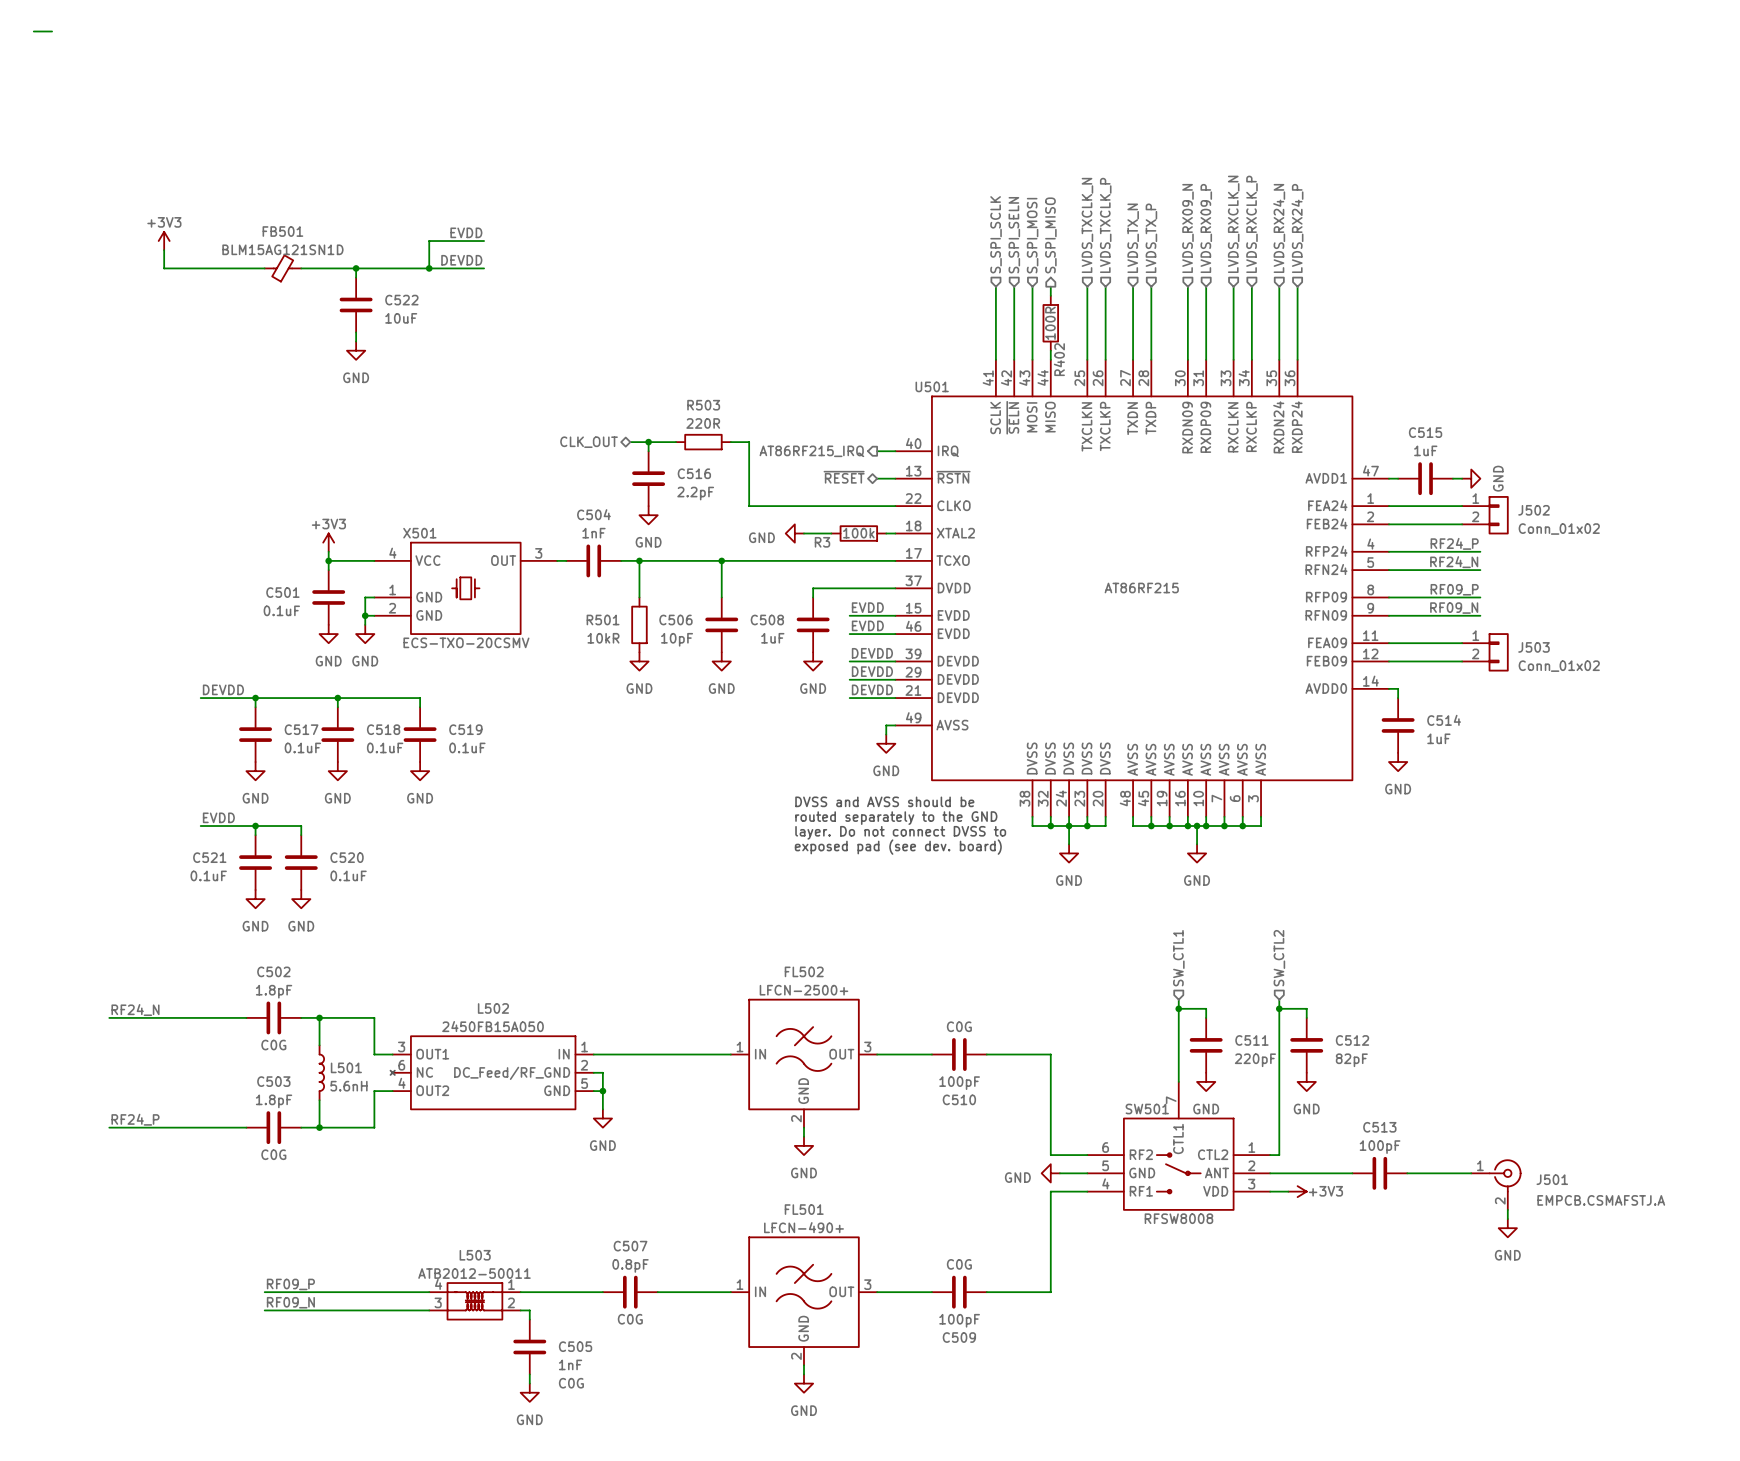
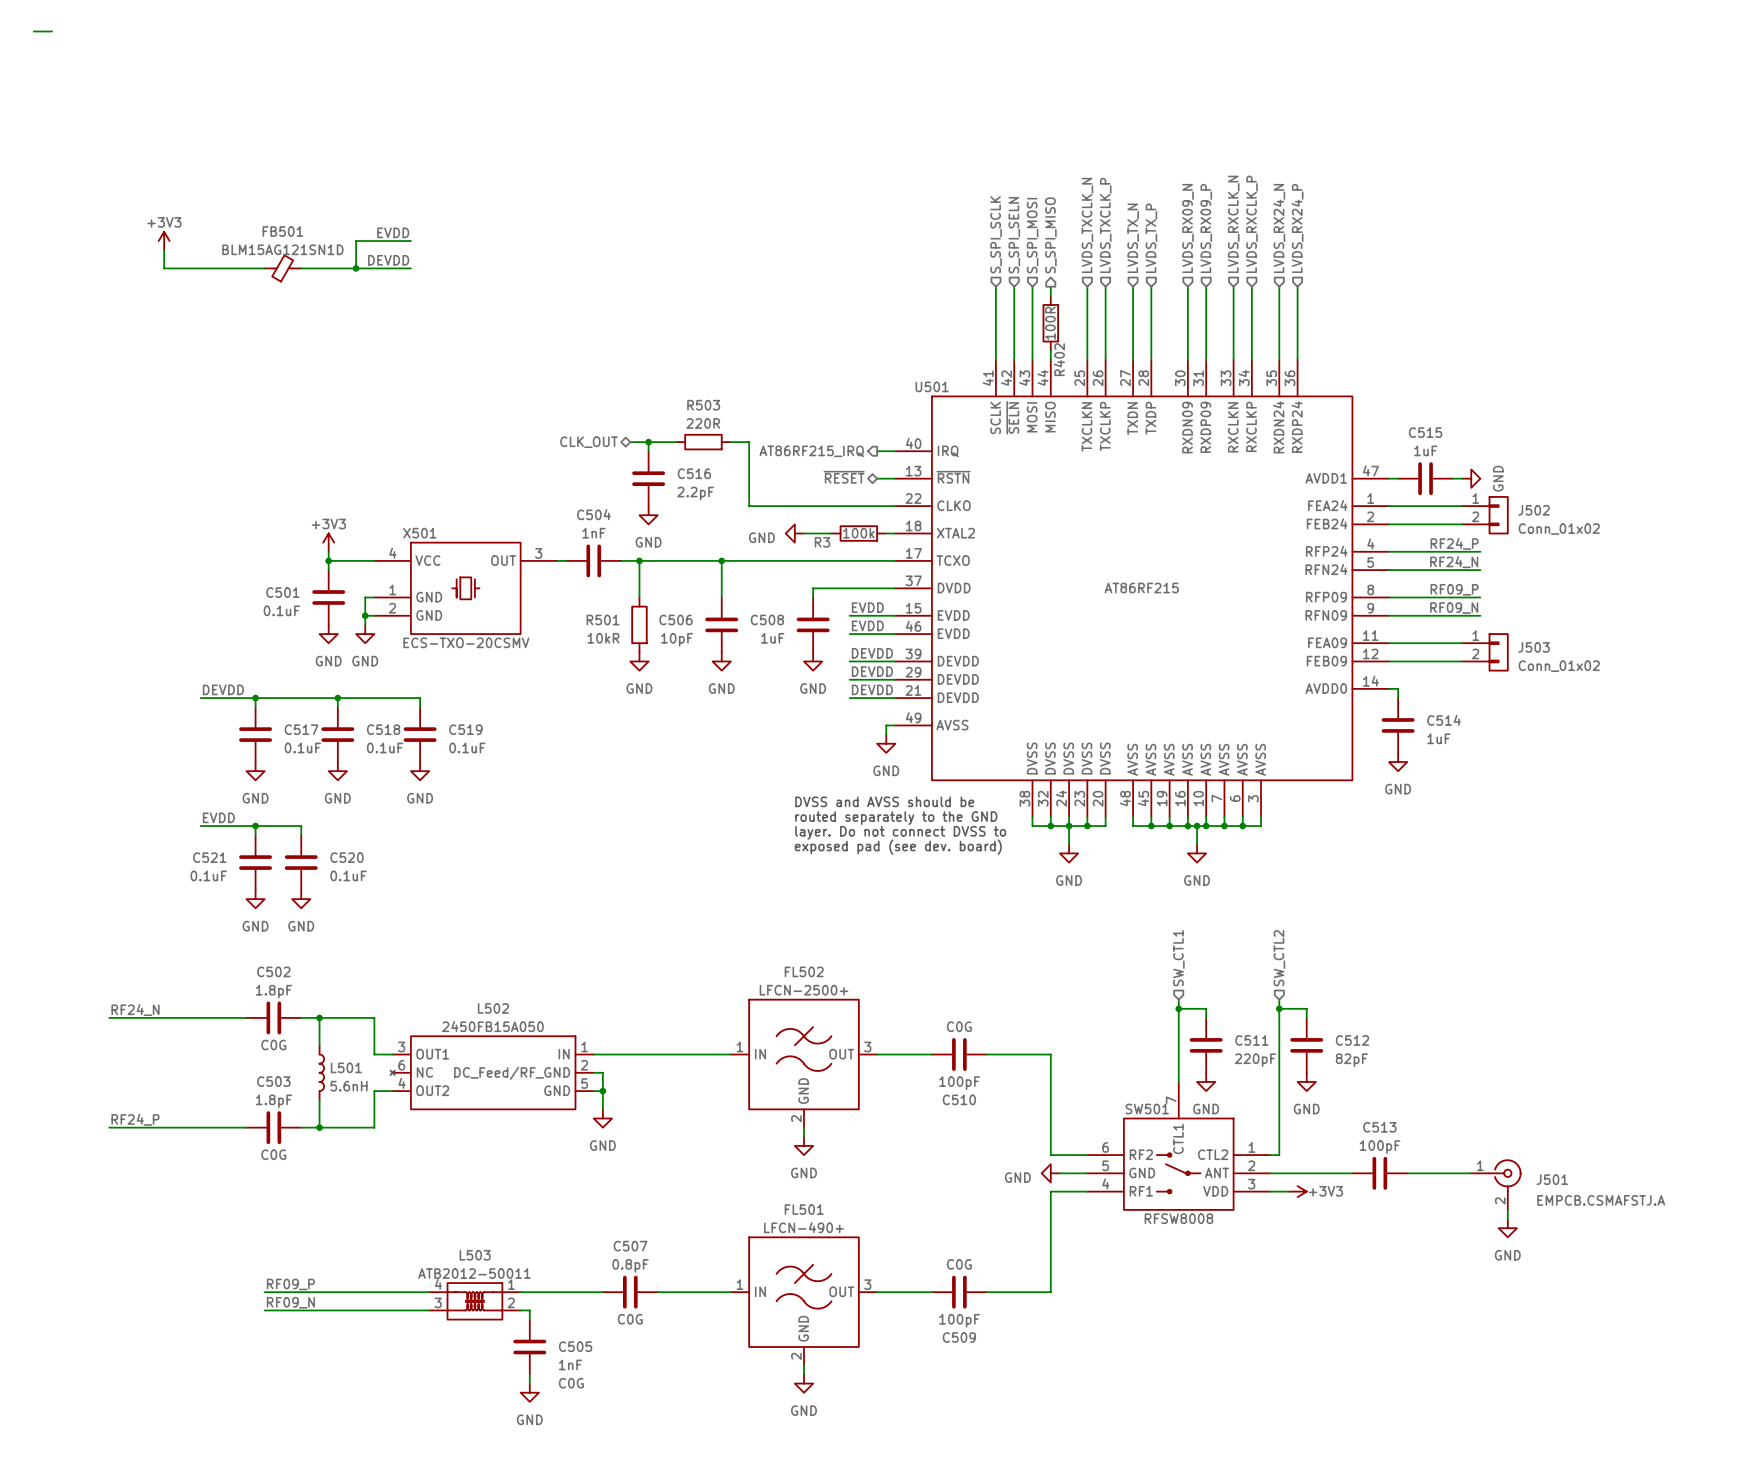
label position: EVDD (466, 232) -> EVDD (393, 232)
wire: (484, 241) (429, 241) (429, 268) -> none
label position: DEVDD (461, 260) -> DEVDD (388, 260)
wire: (356, 268) (356, 277) -> (356, 268) (356, 241) (410, 241)
wire: (410, 268) (484, 268) -> none
junction: (429, 268) -> none
C522: 10uF (356, 304) -> none
wire: (356, 332) (356, 341) -> none
power symbol: GND (356, 350) -> none

